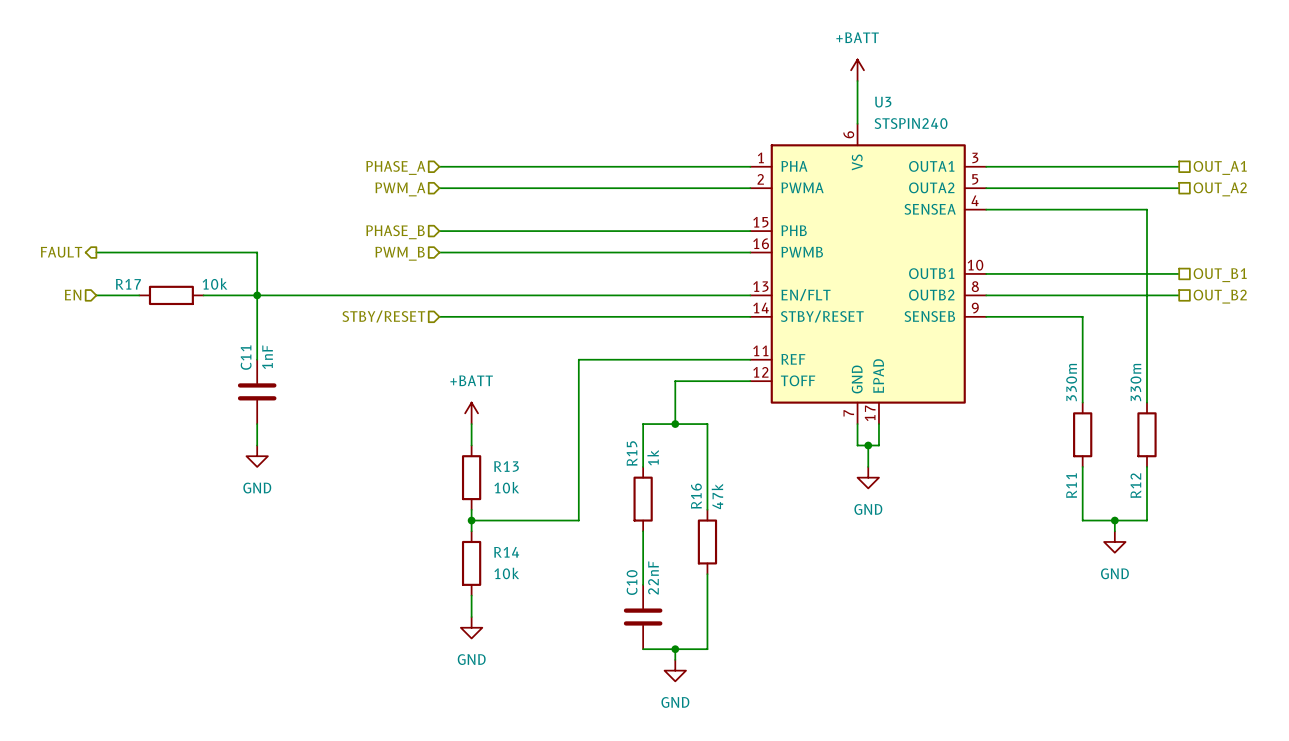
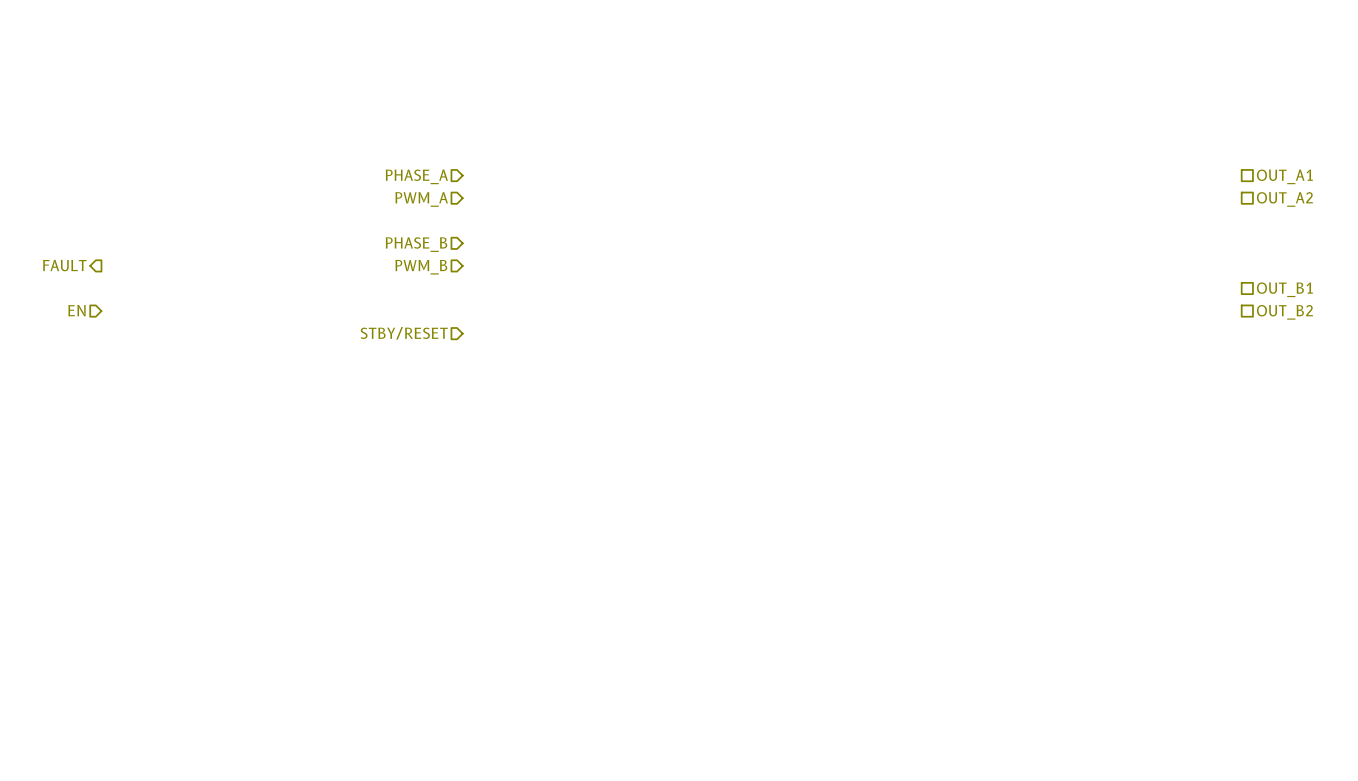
power symbol: +BATT (857, 70) -> none
wire: (857, 80) (857, 123) -> none
wire: (439, 166) (750, 166) -> none
wire: (986, 166) (1179, 166) -> none
wire: (439, 188) (750, 188) -> none
wire: (986, 188) (1179, 188) -> none
wire: (986, 209) (1147, 209) (1147, 402) -> none
wire: (439, 231) (750, 231) -> none
wire: (96, 252) (257, 252) (257, 359) -> none
wire: (439, 252) (750, 252) -> none
U3: STSPIN240 (868, 273) -> none
wire: (986, 273) (1179, 273) -> none
wire: (96, 295) (139, 295) -> none
R17: 10k (171, 295) -> none
wire: (203, 295) (750, 295) -> none
junction: (257, 295) -> none
wire: (986, 295) (1179, 295) -> none
wire: (439, 316) (750, 316) -> none
wire: (986, 316) (1082, 316) (1082, 402) -> none
wire: (750, 359) (578, 359) (578, 520) (471, 520) -> none
wire: (750, 381) (675, 381) (675, 424) -> none
C11: 1nF (257, 391) -> none
power symbol: +BATT (471, 413) -> none
wire: (257, 424) (257, 445) -> none
wire: (471, 424) (471, 445) -> none
junction: (675, 424) -> none
wire: (857, 424) (857, 445) (878, 445) (878, 424) -> none
R11: 330m (1082, 434) -> none
R12: 330m (1147, 434) -> none
wire: (868, 445) (868, 466) -> none
junction: (868, 445) -> none
power symbol: GND (257, 456) -> none
wire: (643, 466) (643, 424) (707, 424) (707, 509) -> none
wire: (1082, 466) (1082, 520) (1147, 520) (1147, 466) -> none
R13: 10k (471, 477) -> none
power symbol: GND (868, 477) -> none
R15: 1k (643, 499) -> none
wire: (471, 509) (471, 531) -> none
junction: (471, 520) -> none
wire: (1114, 520) (1114, 531) -> none
junction: (1114, 520) -> none
wire: (643, 531) (643, 584) -> none
R16: 47k (707, 541) -> none
power symbol: GND (1114, 541) -> none
R14: 10k (471, 563) -> none
wire: (707, 574) (707, 649) (643, 649) -> none
wire: (471, 595) (471, 617) -> none
C10: 22nF (643, 617) -> none
power symbol: GND (471, 627) -> none
wire: (675, 649) (675, 659) -> none
junction: (675, 649) -> none
power symbol: GND (675, 670) -> none

